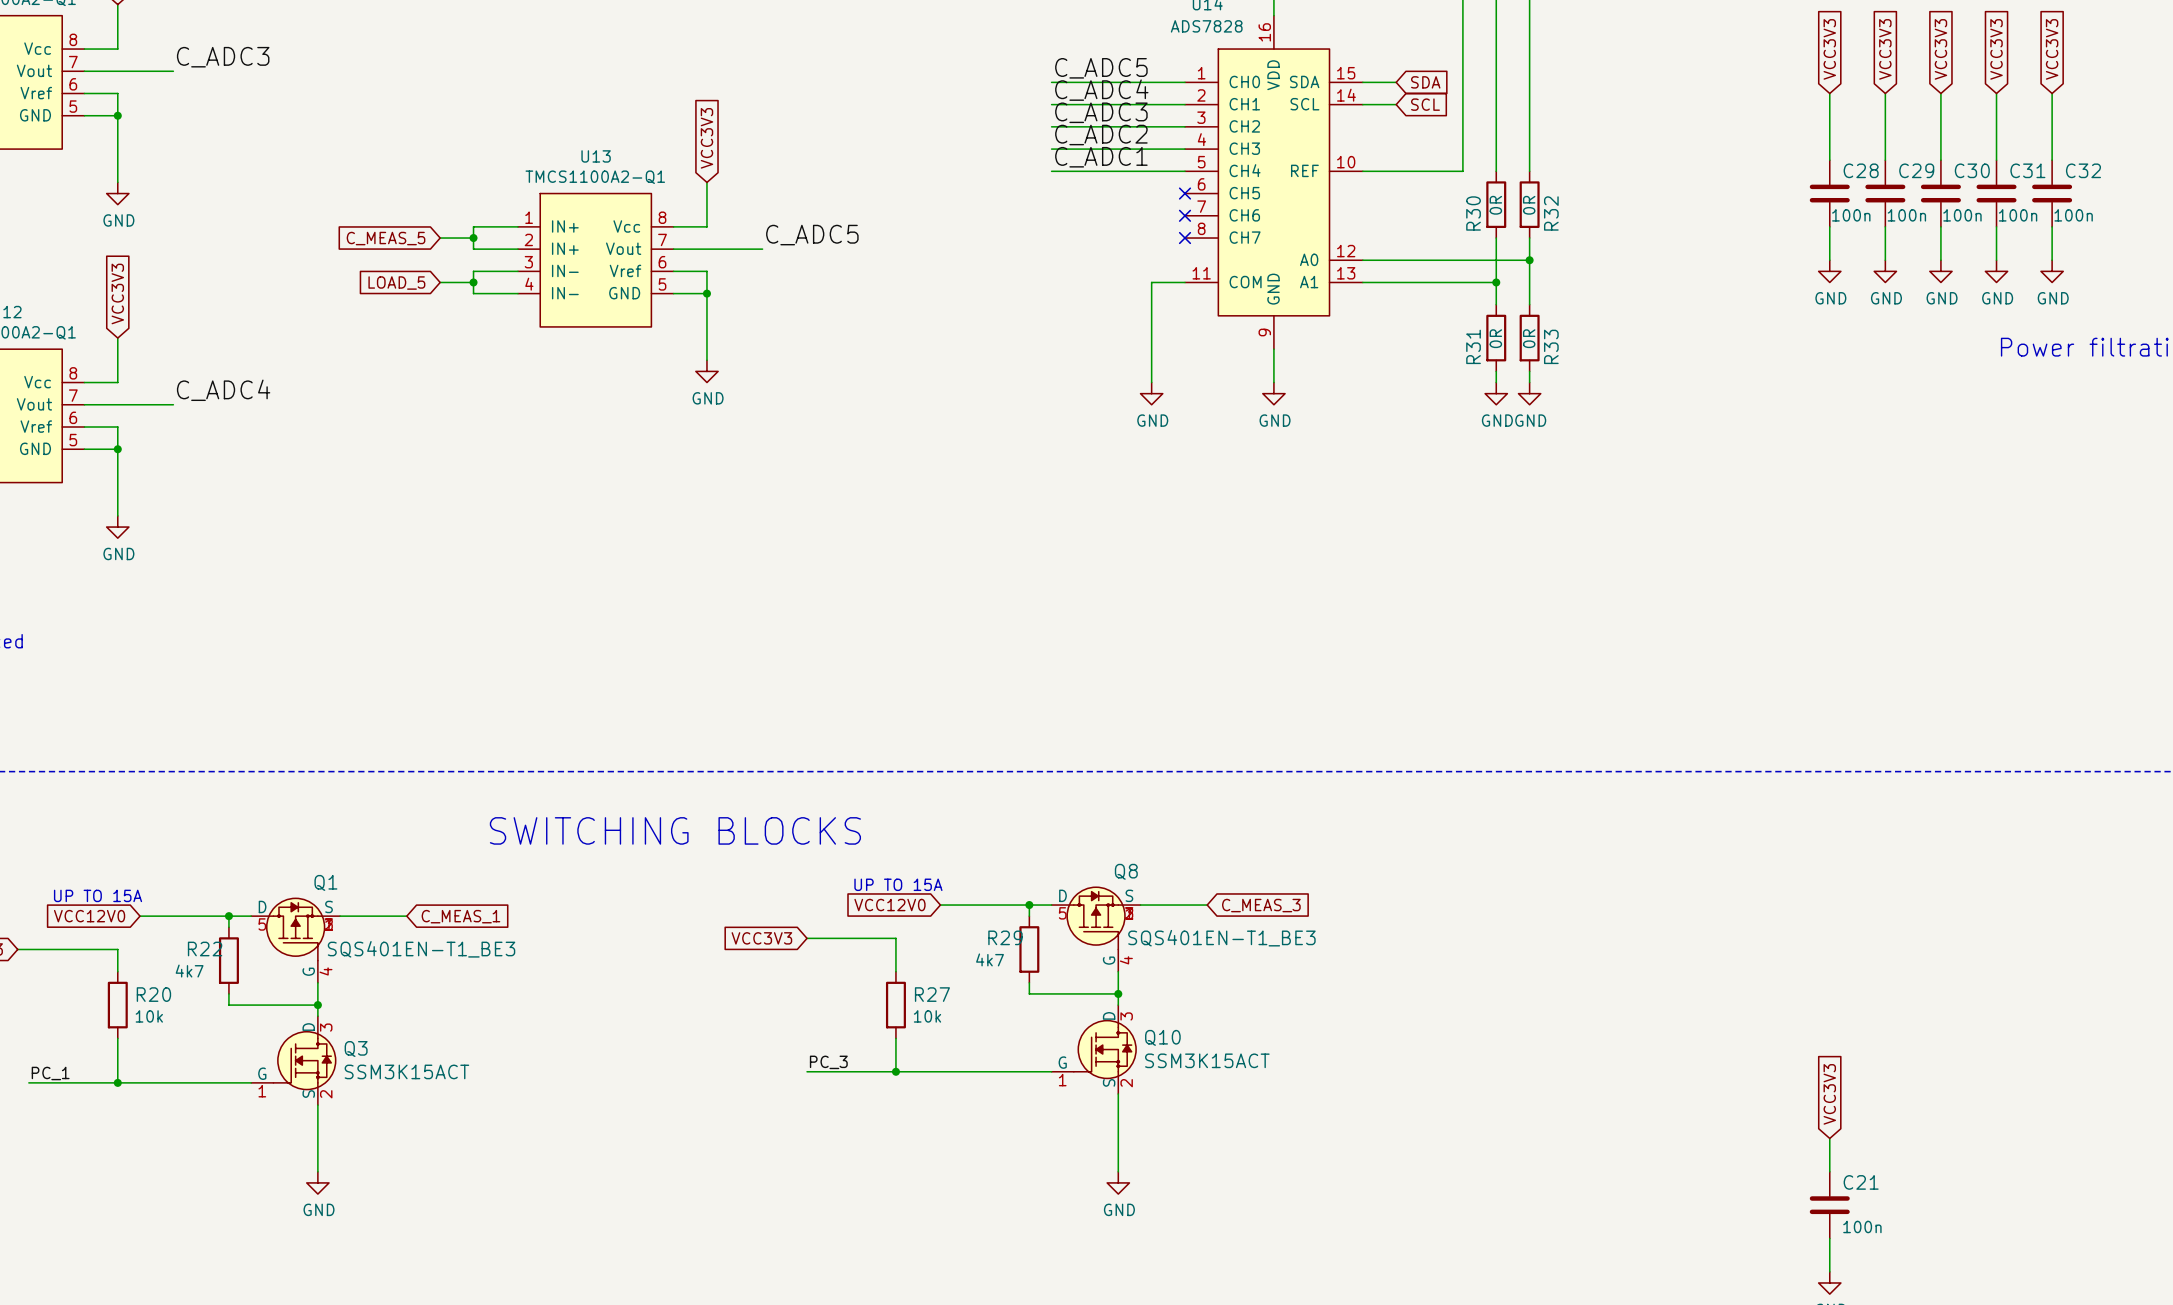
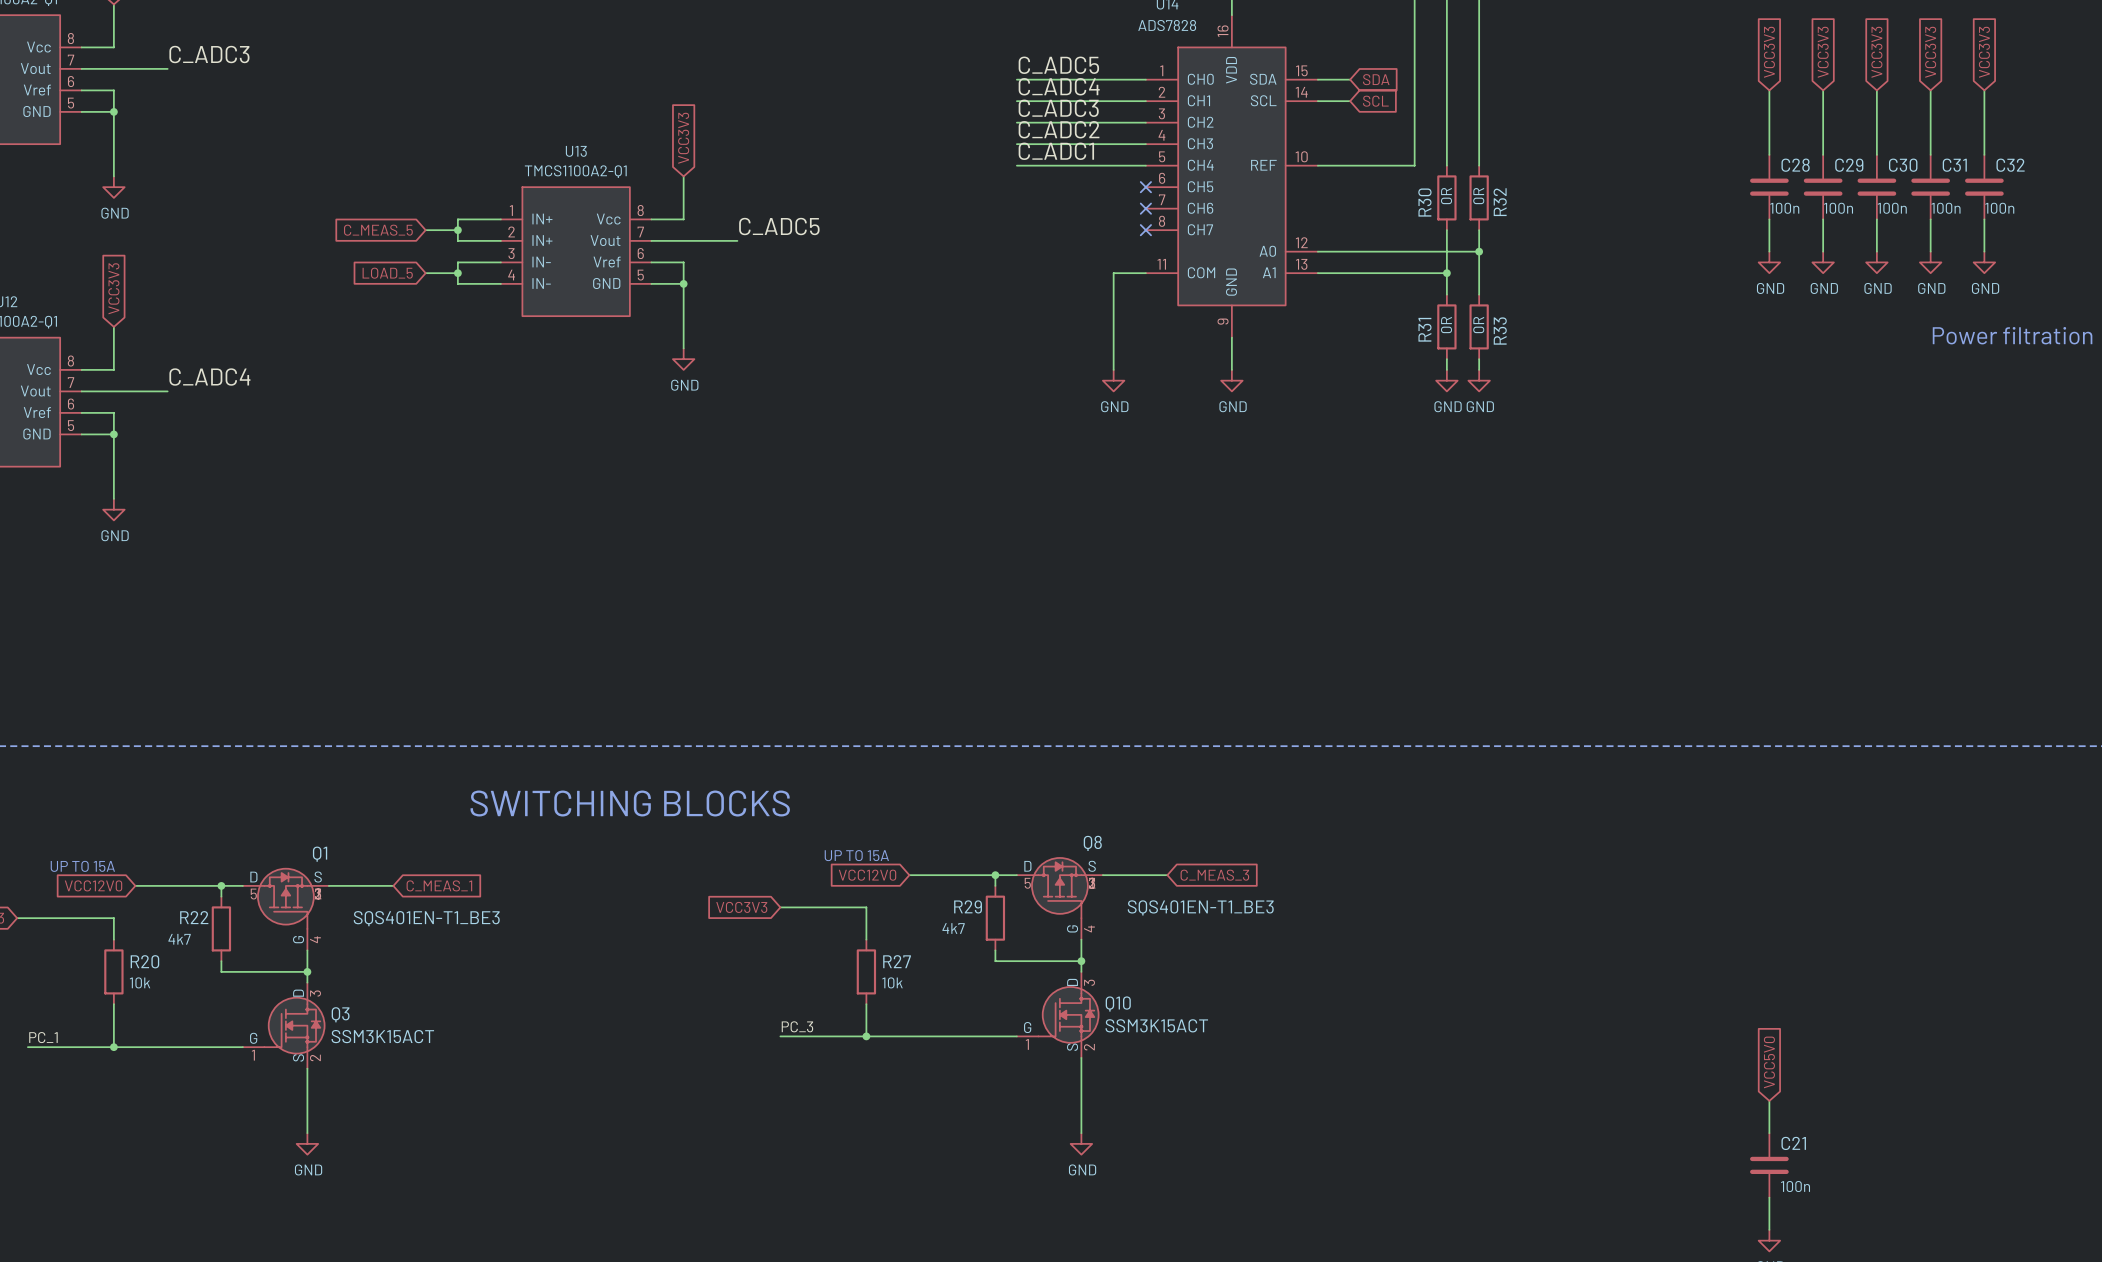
global label: VCC3V3 (1829, 1094) -> VCC5V0 (1769, 1062)

